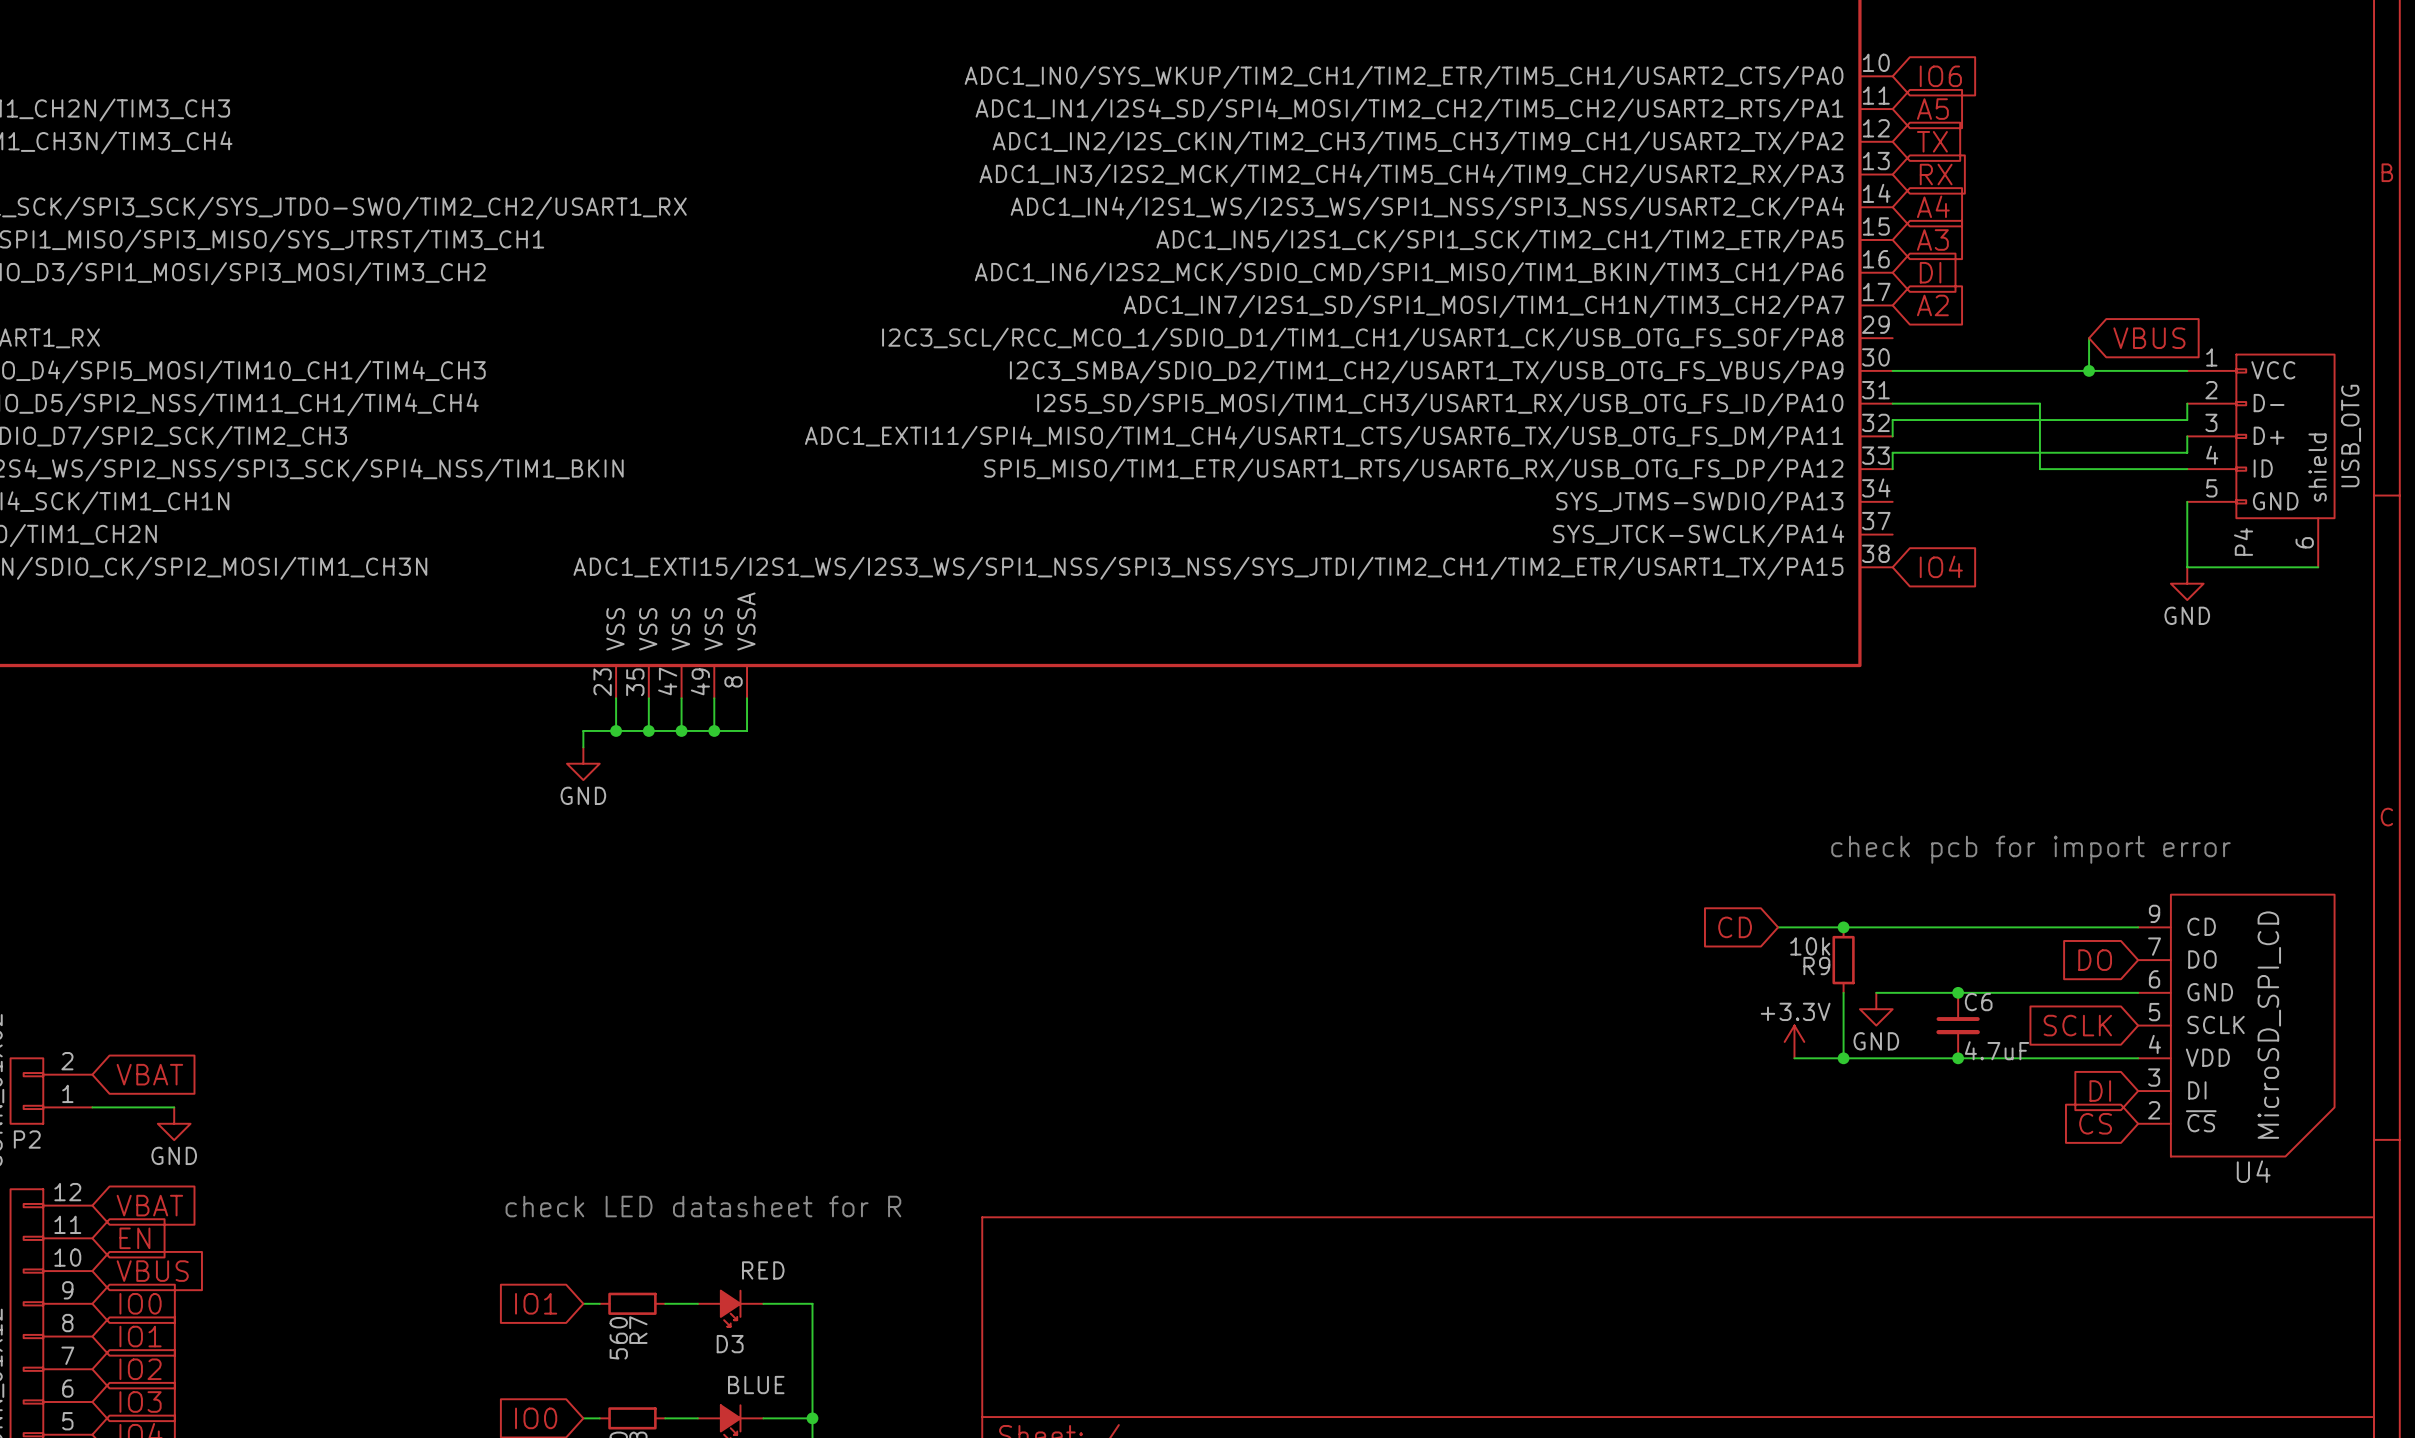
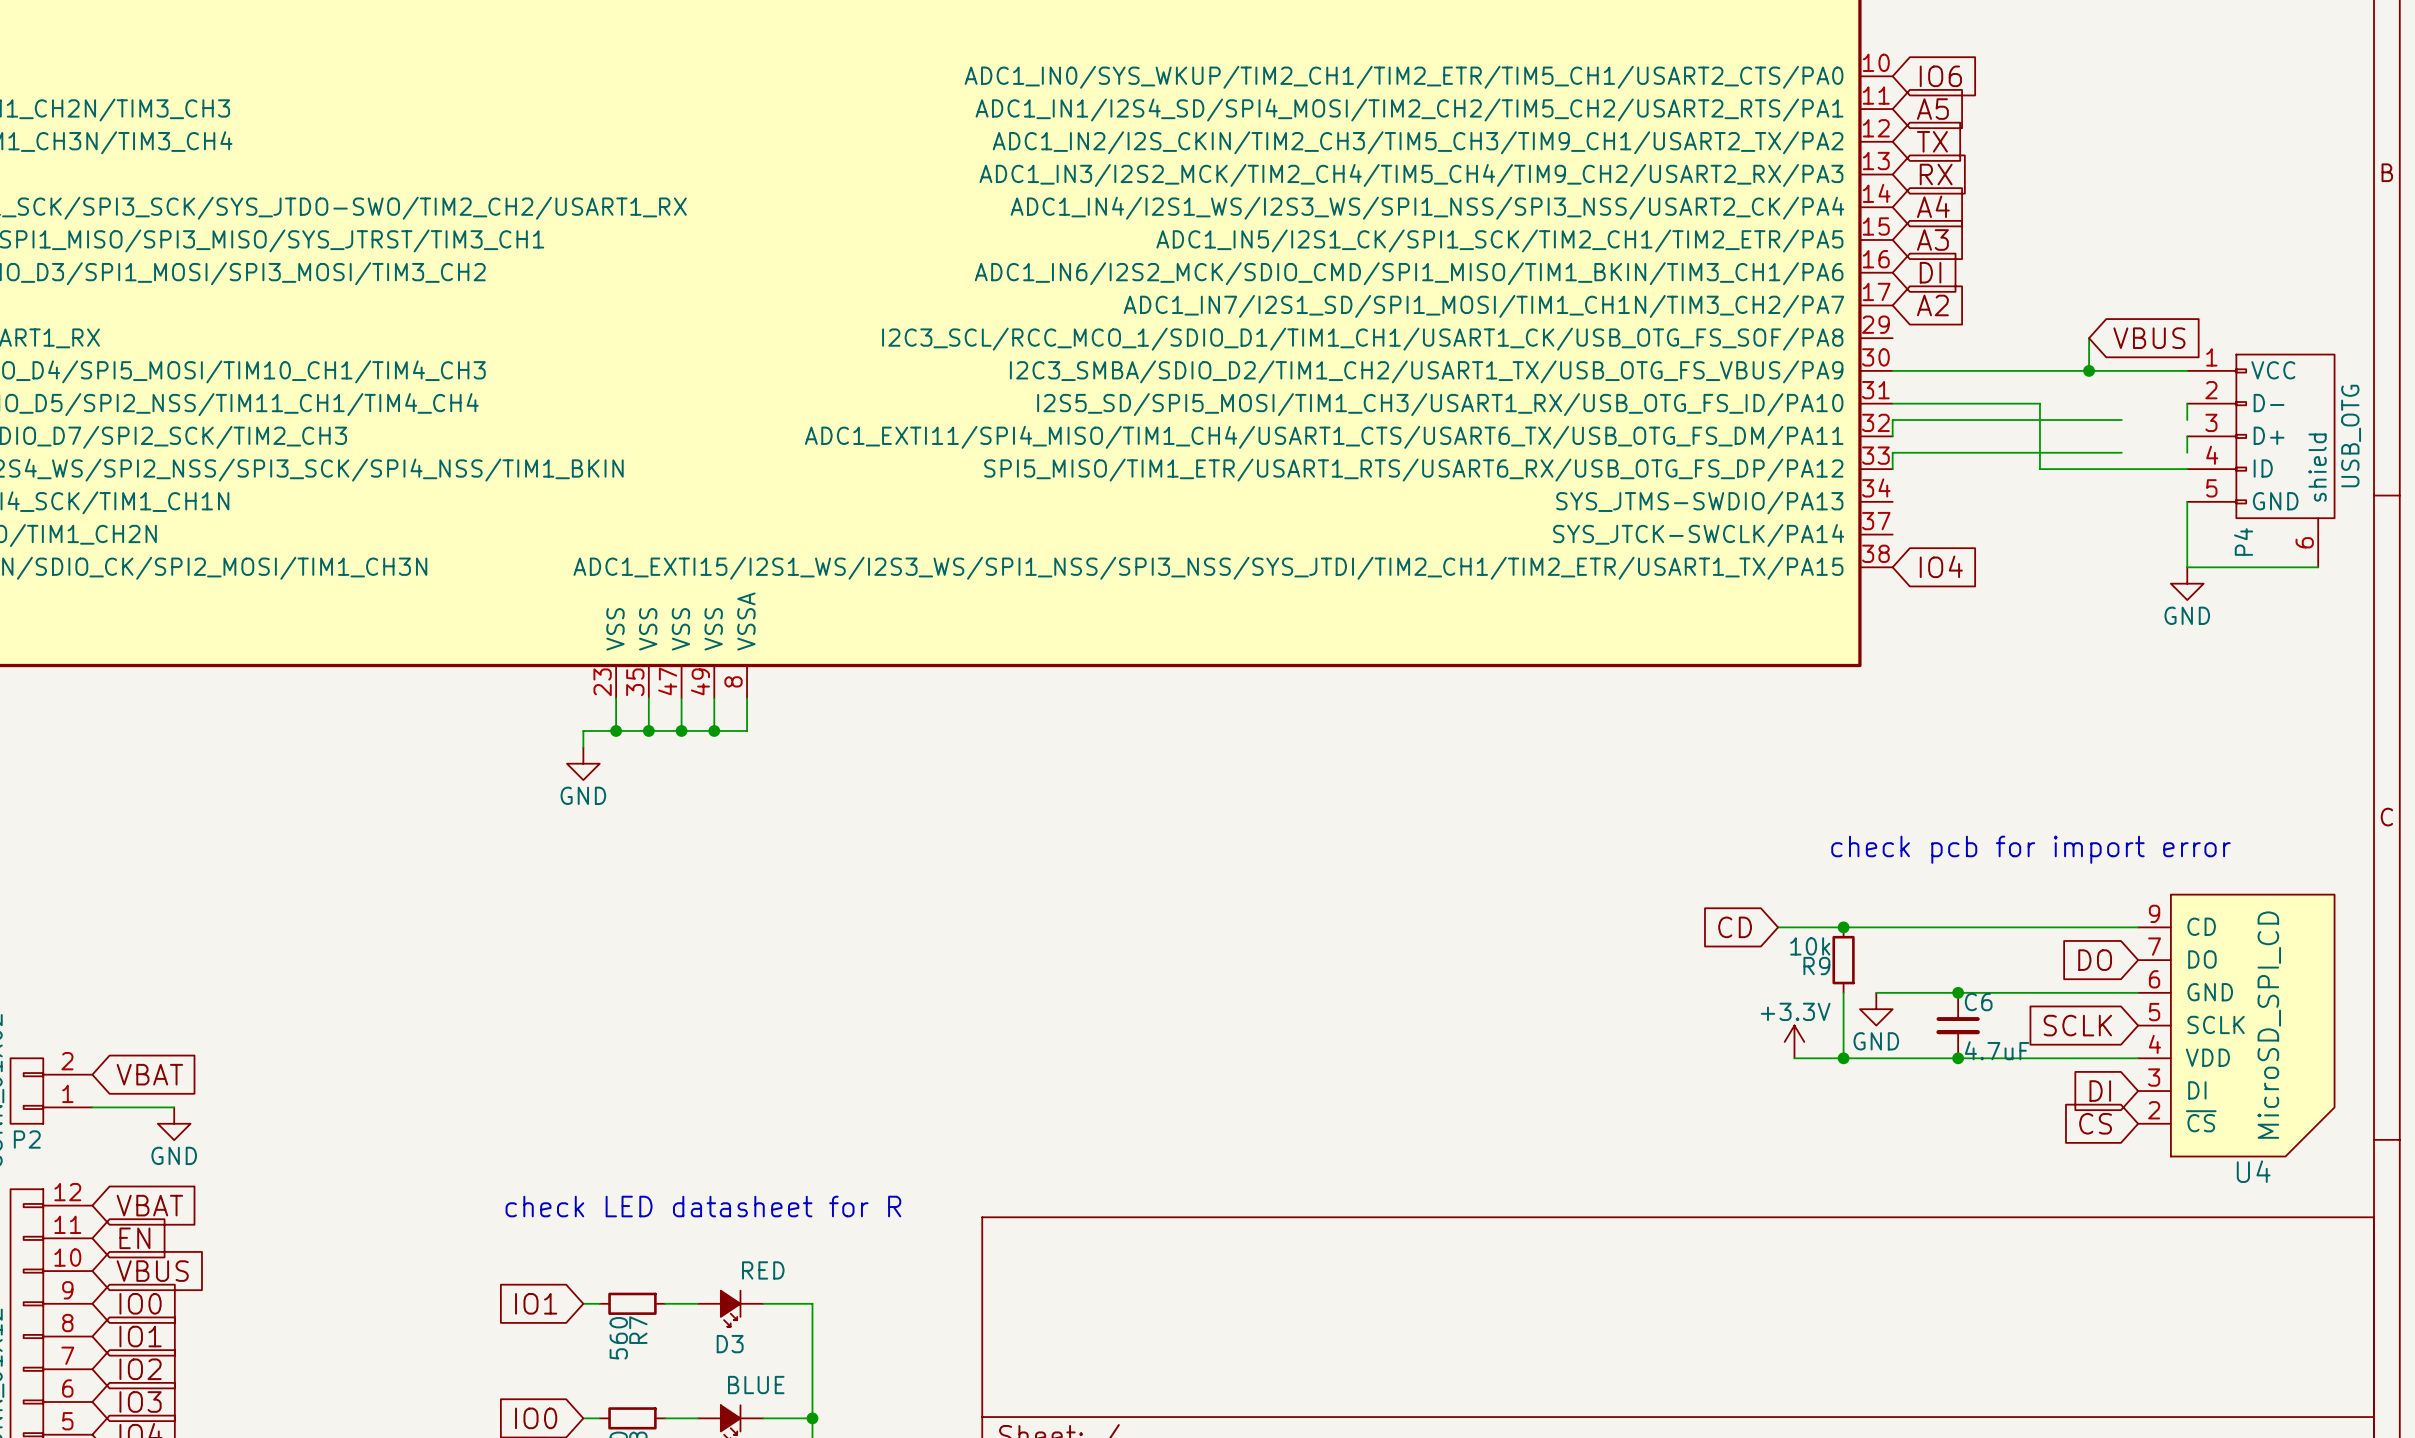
wire: (2121, 420) (2187, 420) -> none
wire: (2121, 452) (2187, 452) -> none

